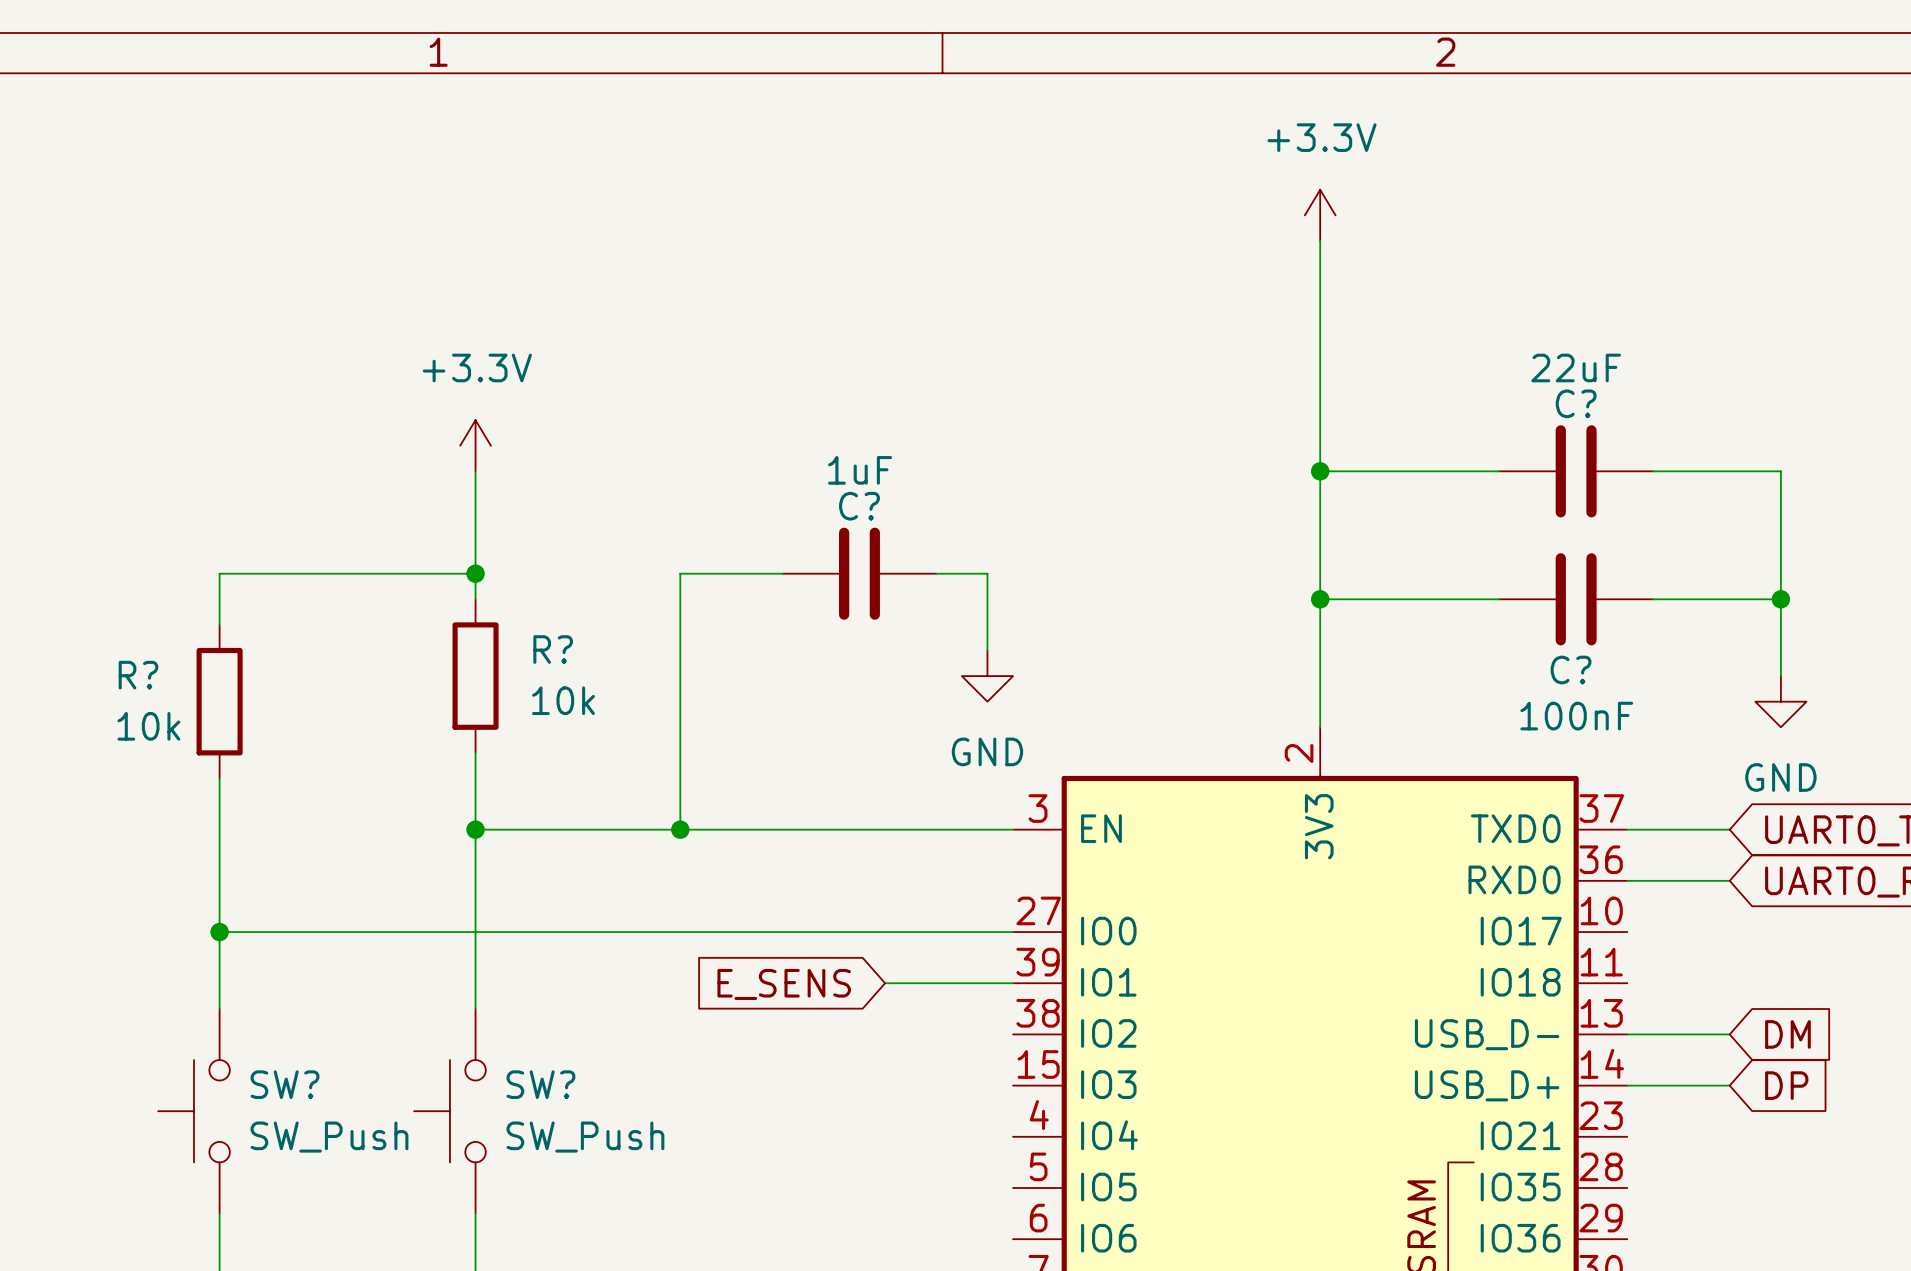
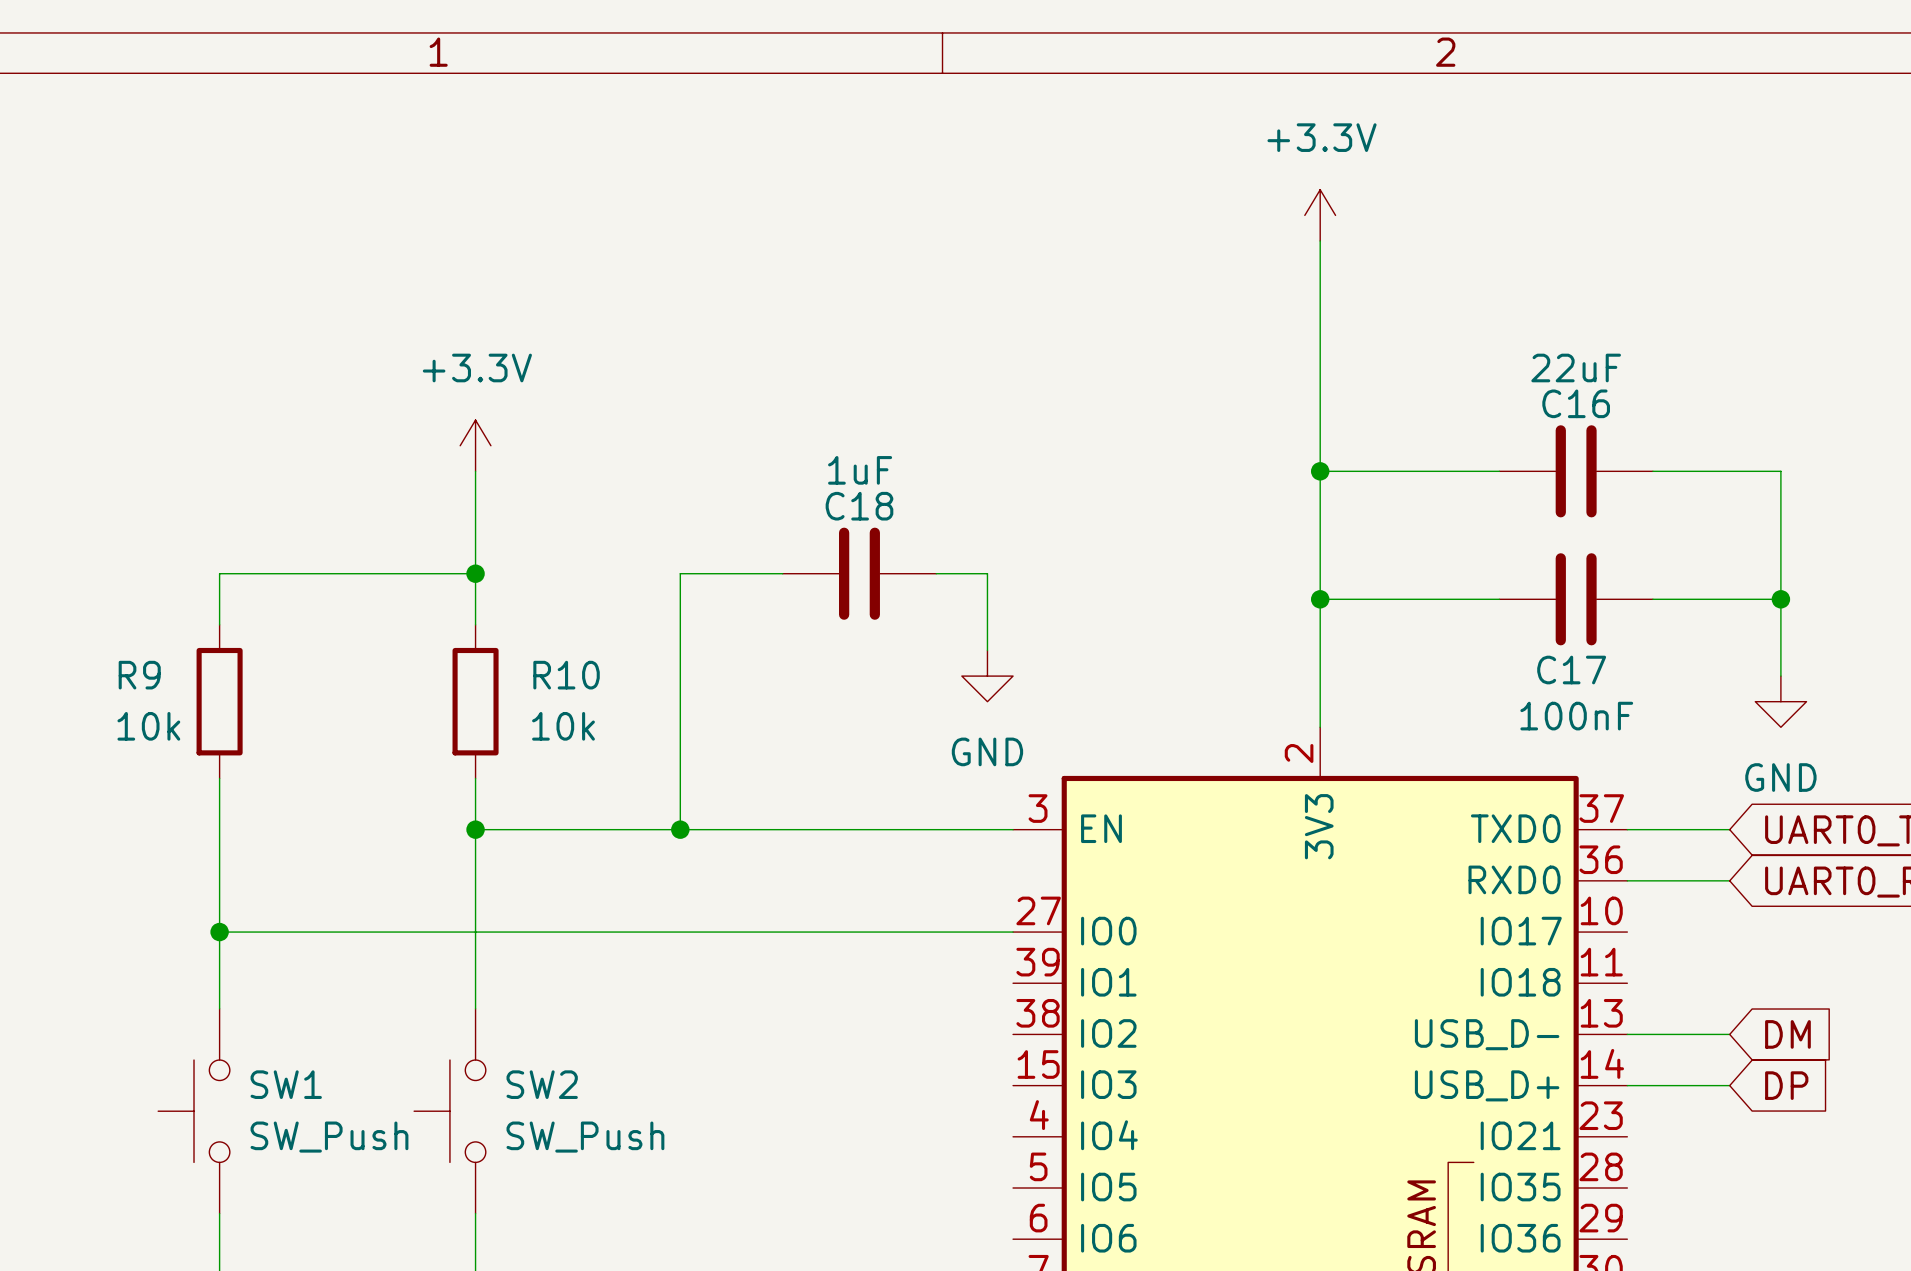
C? name: C? (1576, 403) -> C16 (1576, 403)
C? name: C? (859, 506) -> C18 (859, 506)
C? name: C? (1571, 670) -> C17 (1571, 670)
R? name: R? (138, 675) -> R9 (139, 675)
R?: 10k (475, 676) -> none
R10: none -> 10k (475, 701)
wire: (885, 983) (1013, 983) -> none
global label: E_SENS (784, 984) -> none
SW? name: SW? (285, 1084) -> SW1 (286, 1084)
SW? name: SW? (540, 1084) -> SW2 (542, 1084)

